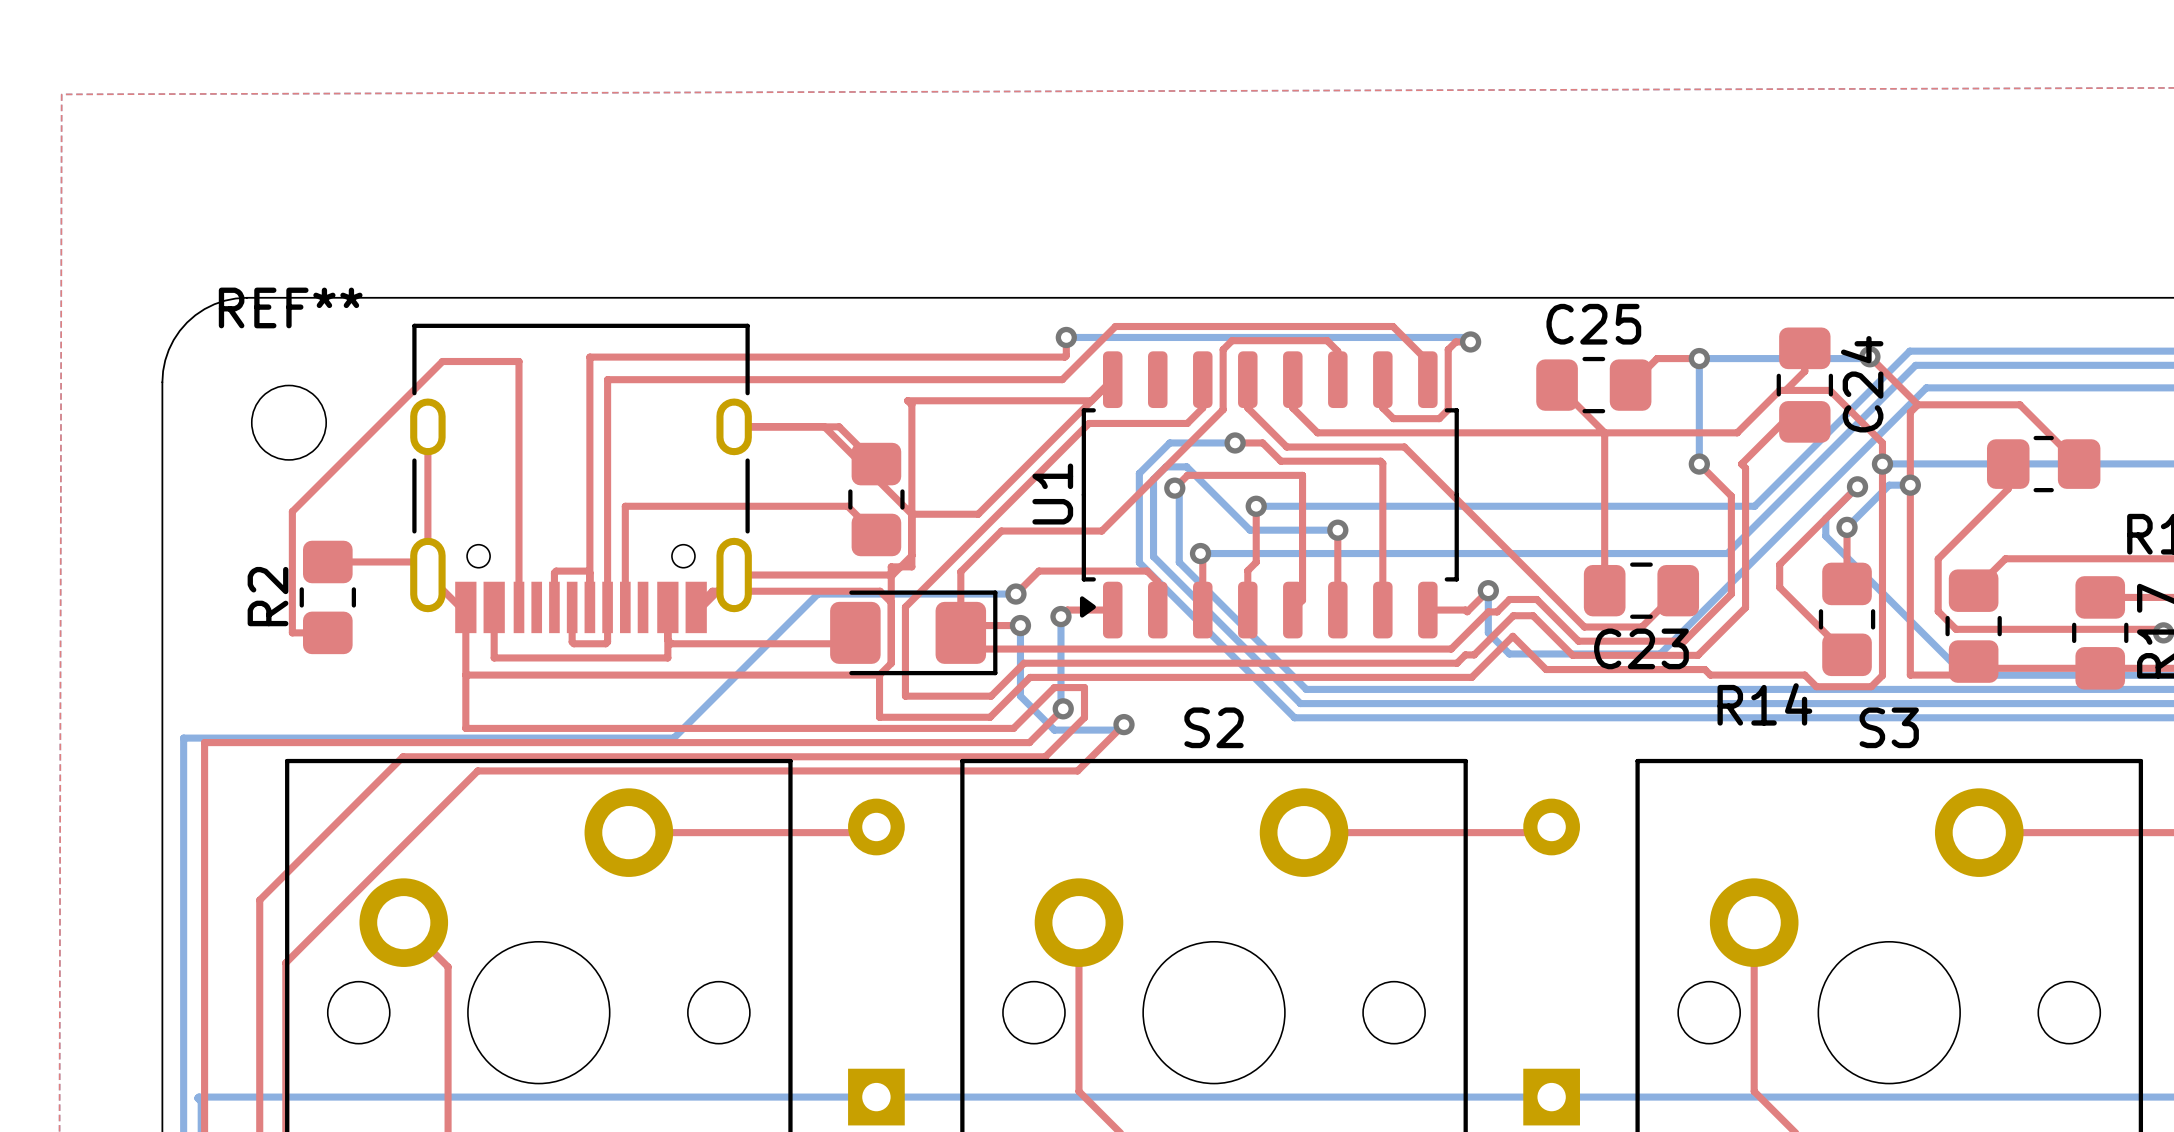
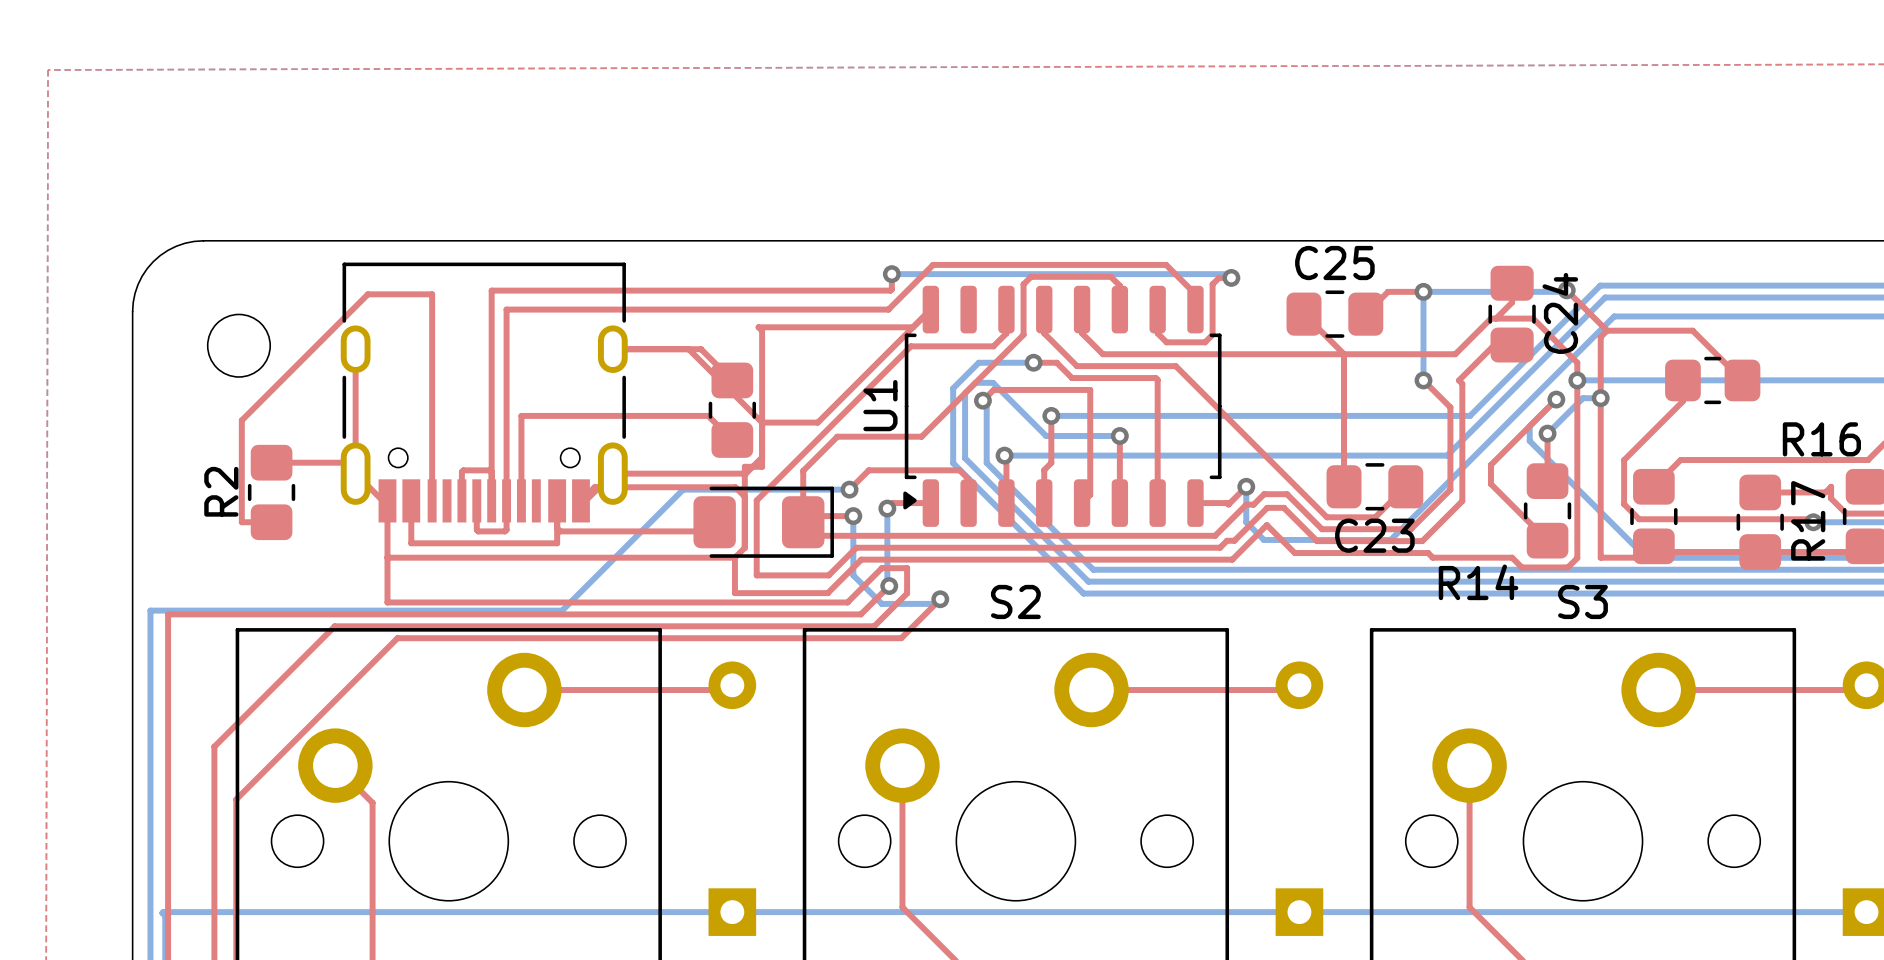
REF** name: REF** (290, 307) -> none

